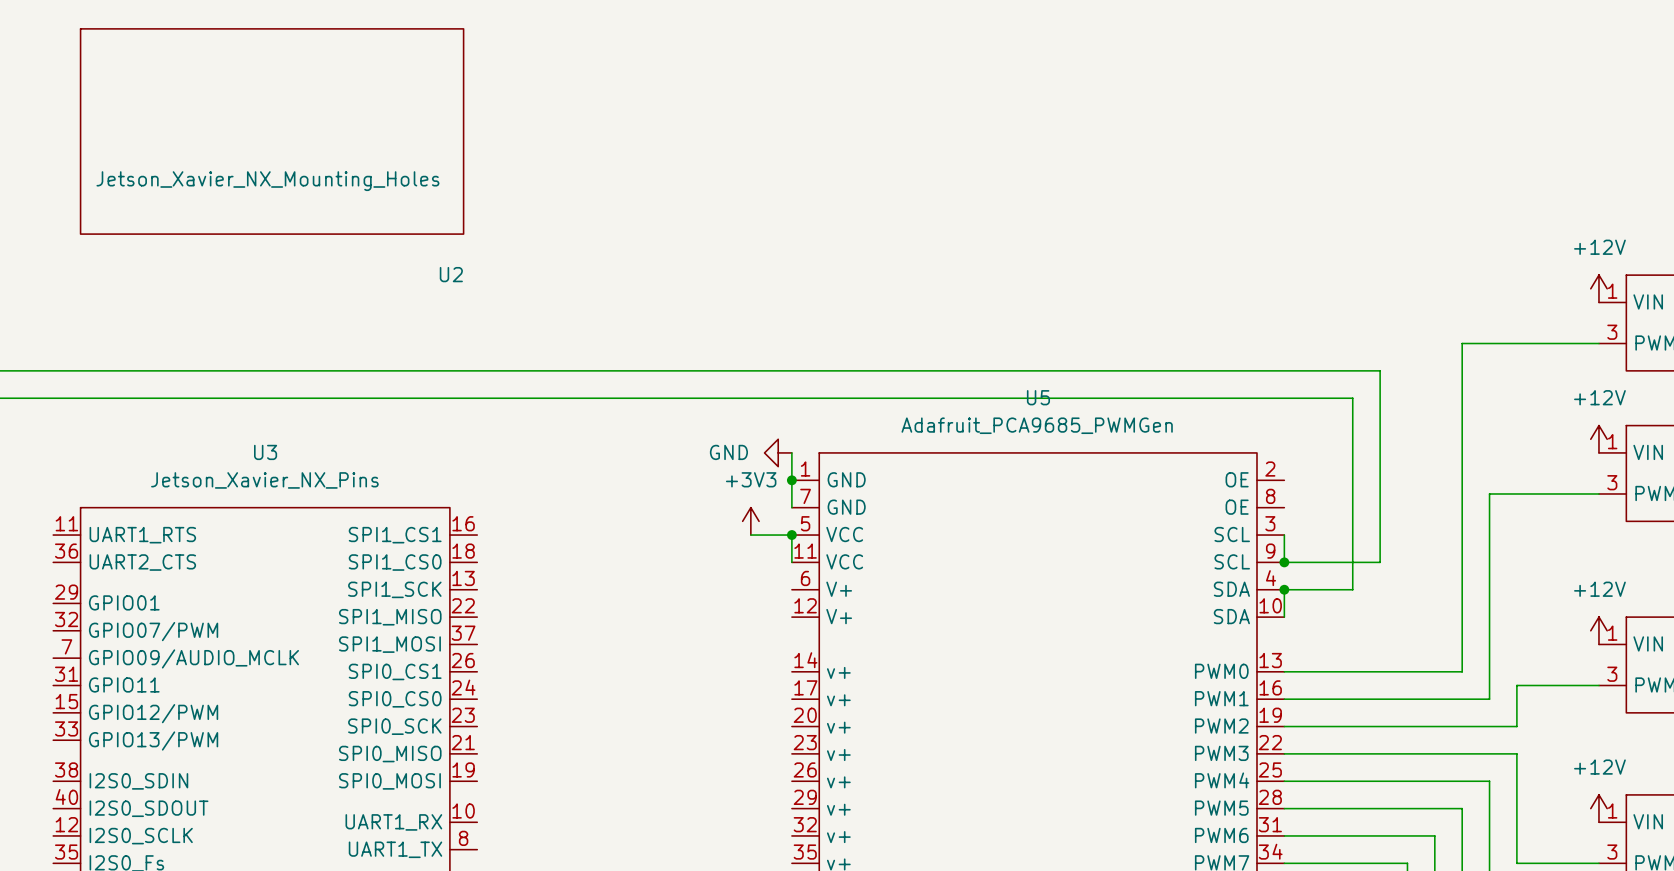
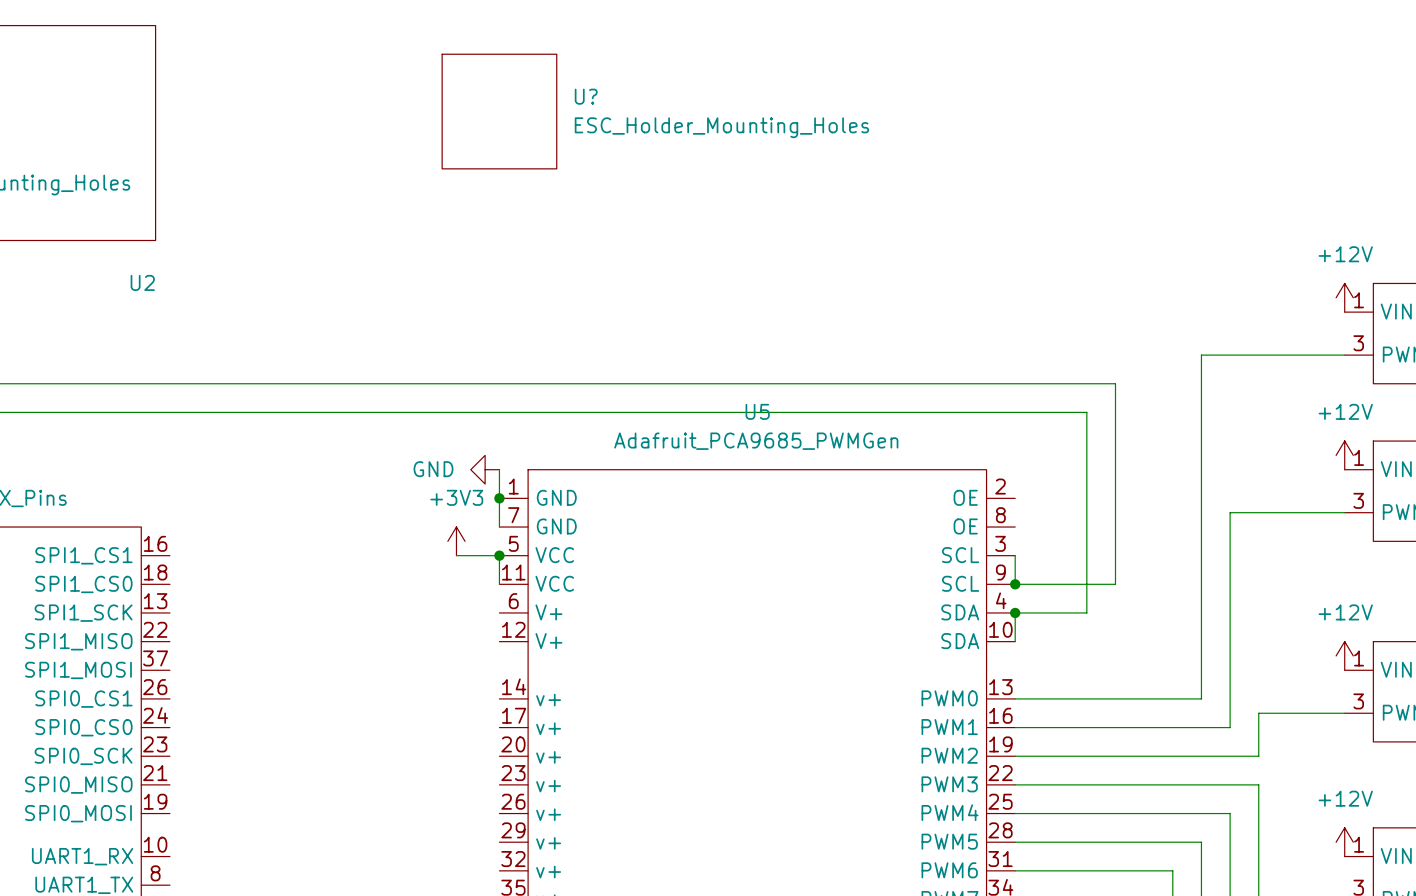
U?: none -> ESC_Holder_Mounting_Holes (499, 111)

